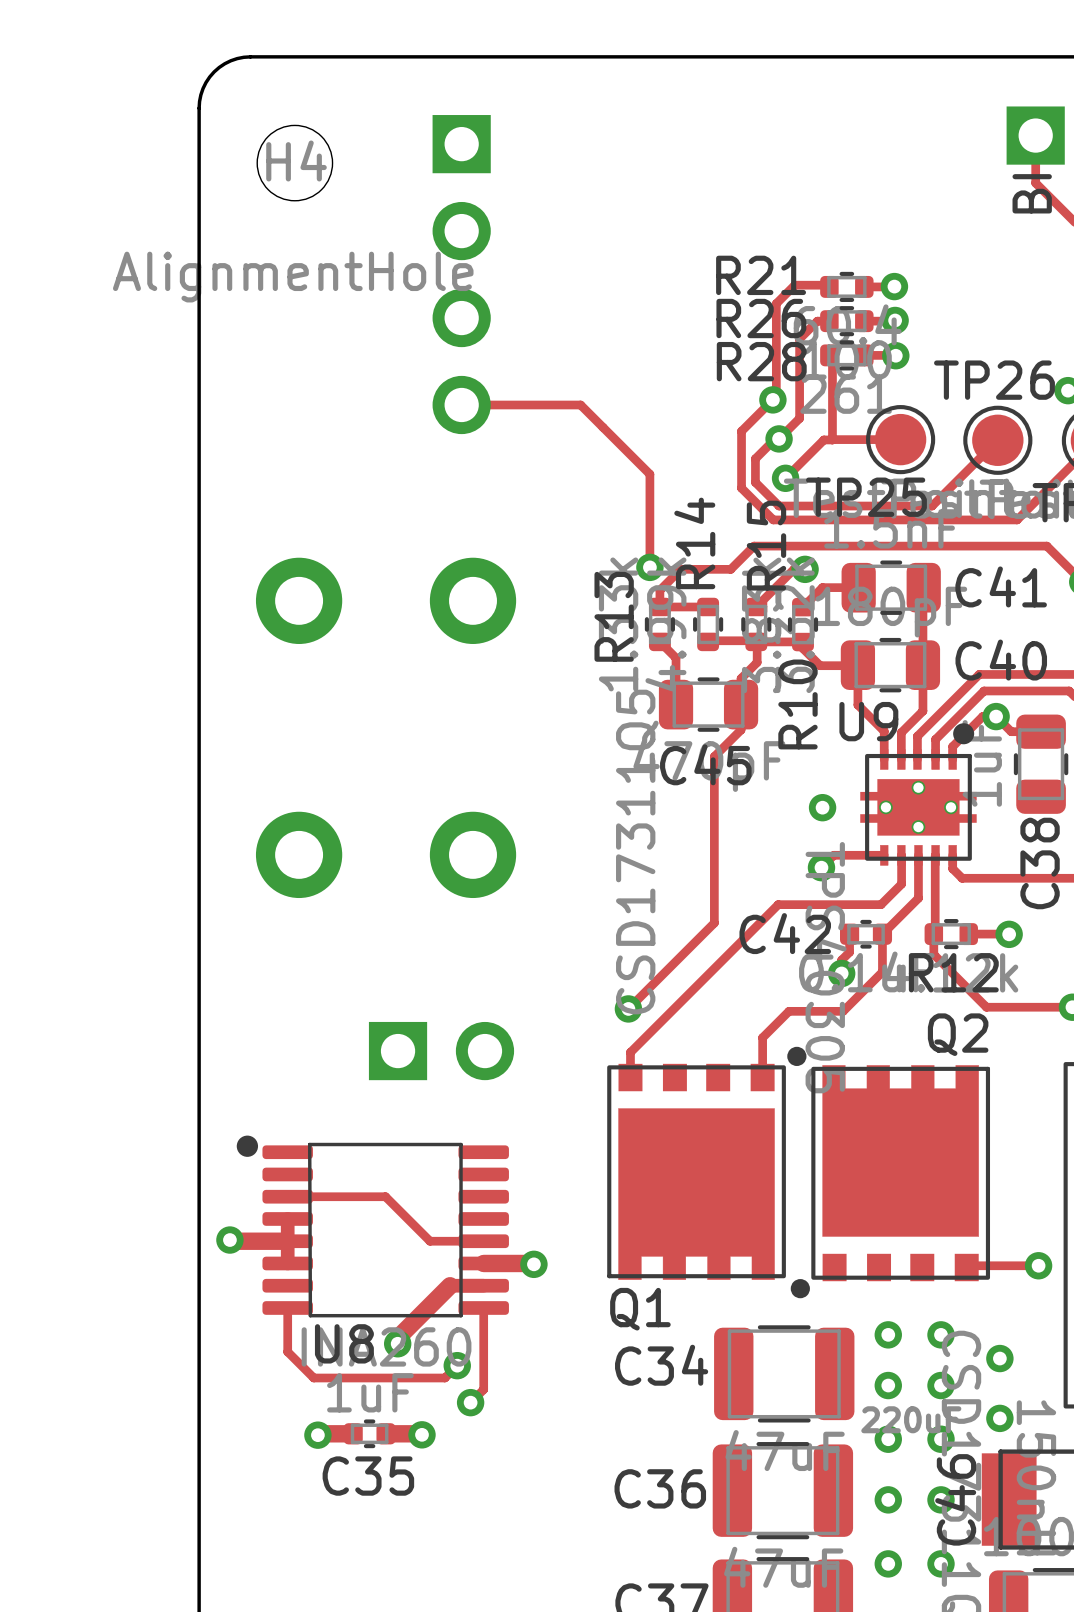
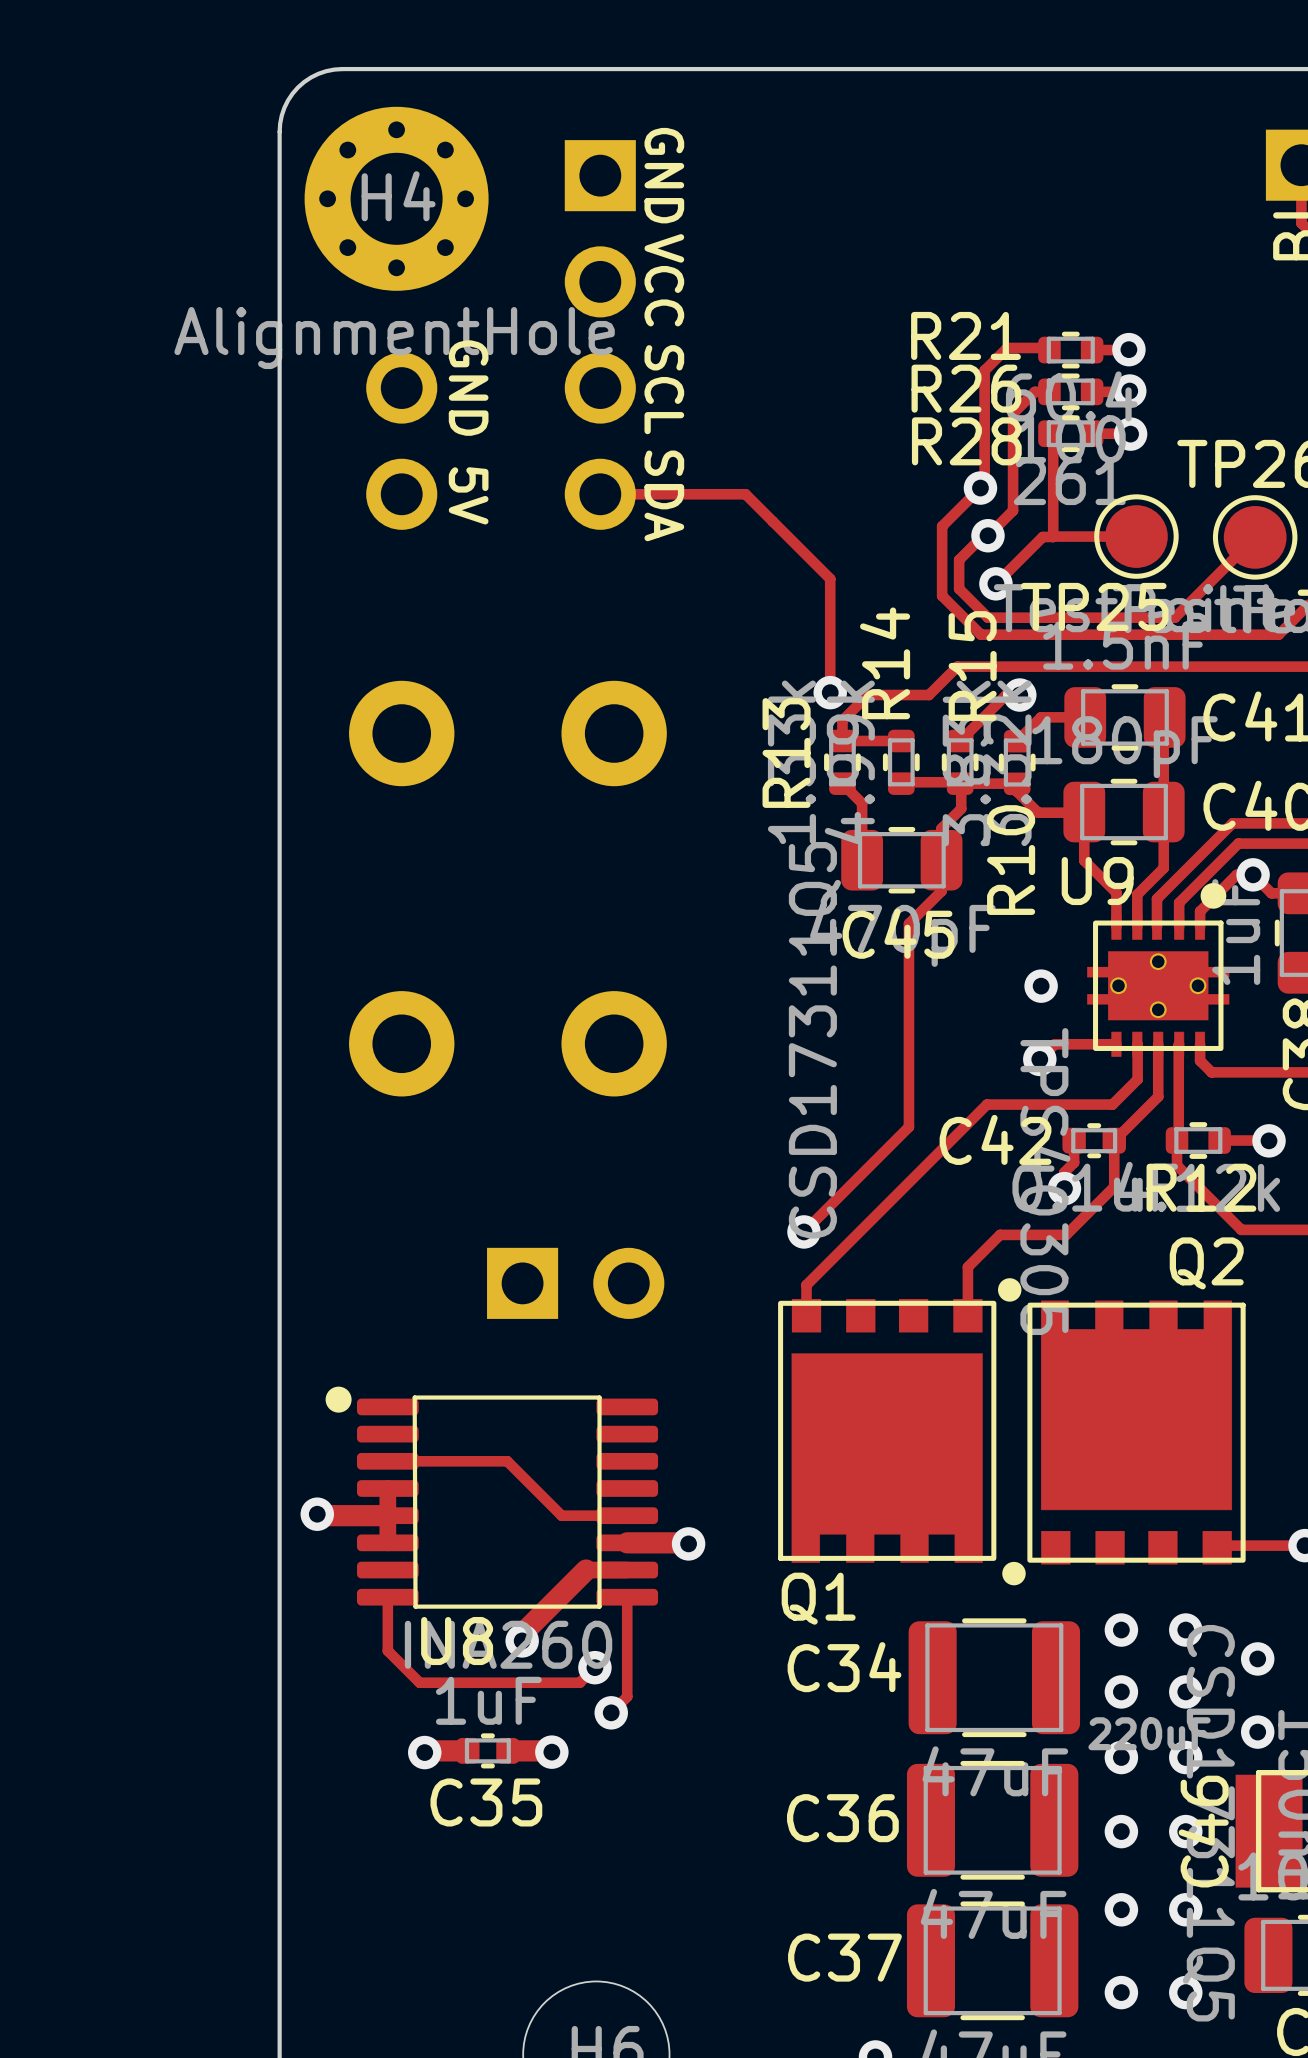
H4 footprint: [257, 125, 333, 201] -> [304, 106, 489, 291]
text: none -> GND (664, 175)
text: none -> VCC (664, 280)
part: none -> (401, 388)
text: none -> GND (468, 388)
text: none -> SCL (664, 389)
part: none -> (401, 494)
text: none -> 5V (468, 495)
text: none -> SDA (664, 495)

